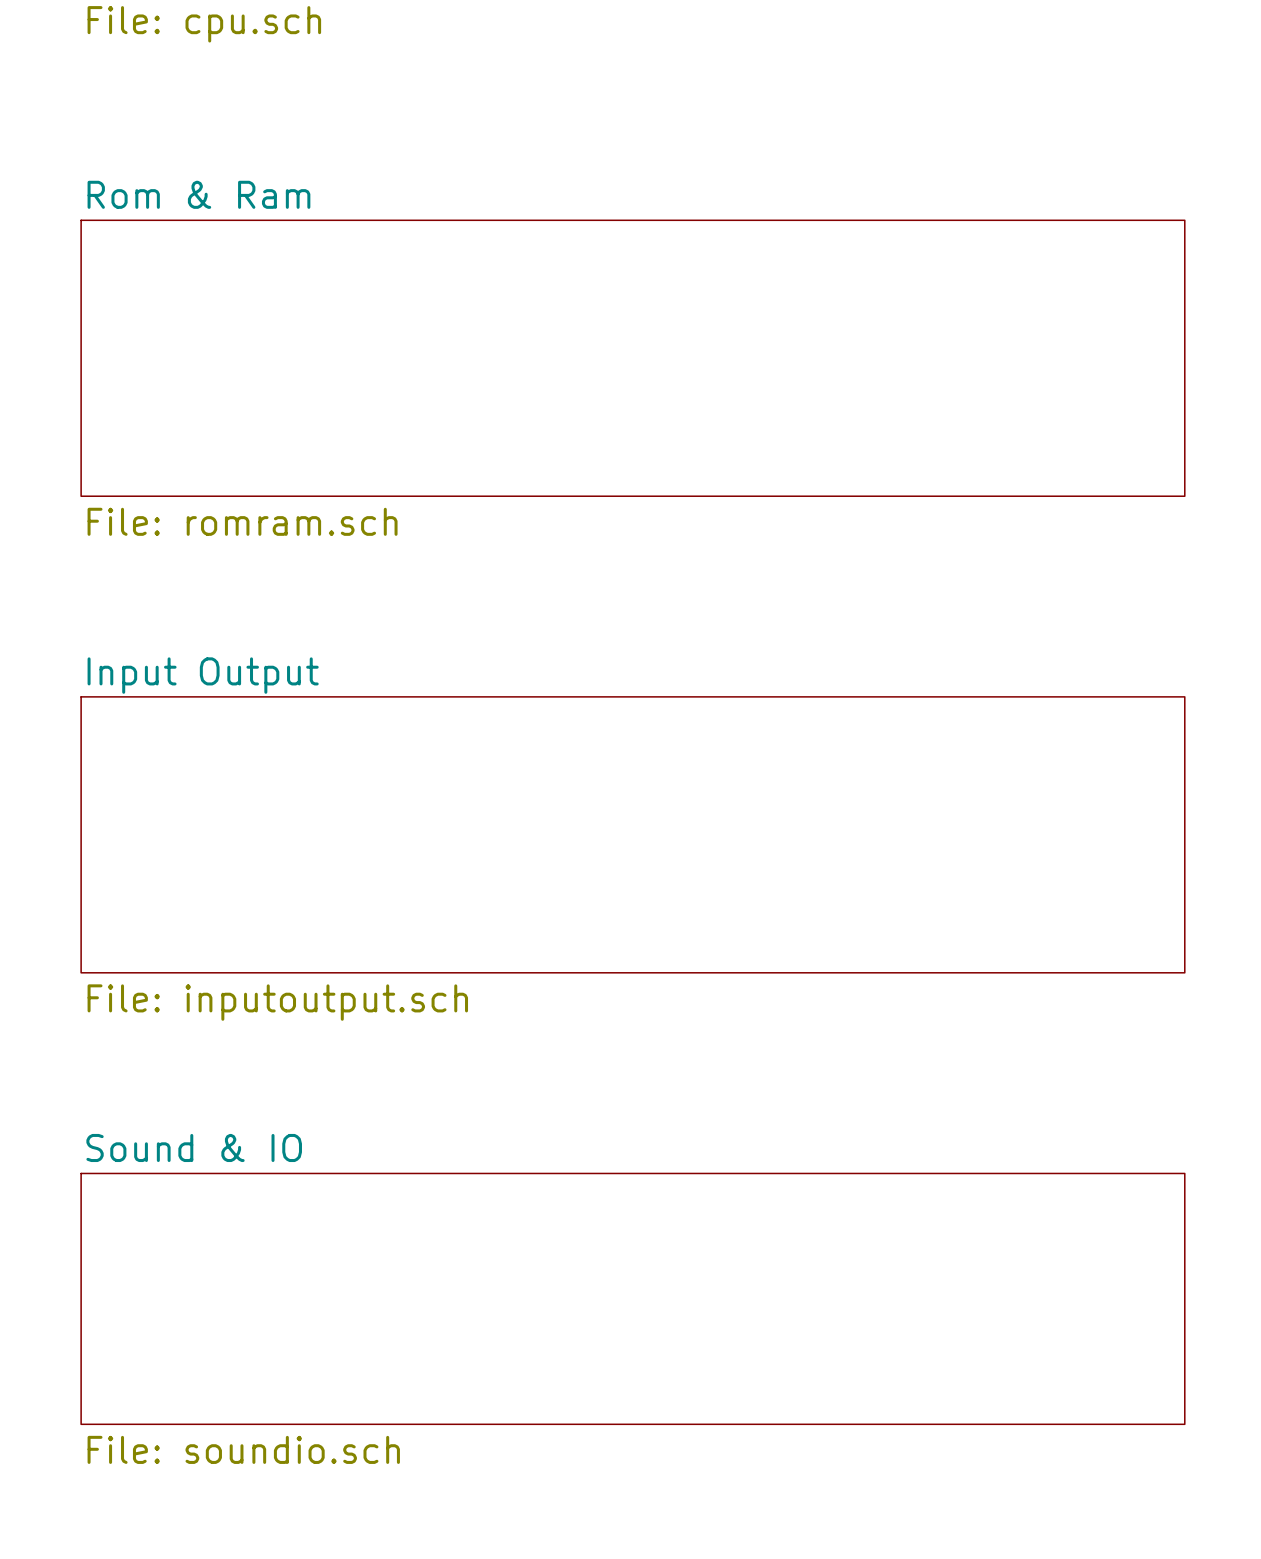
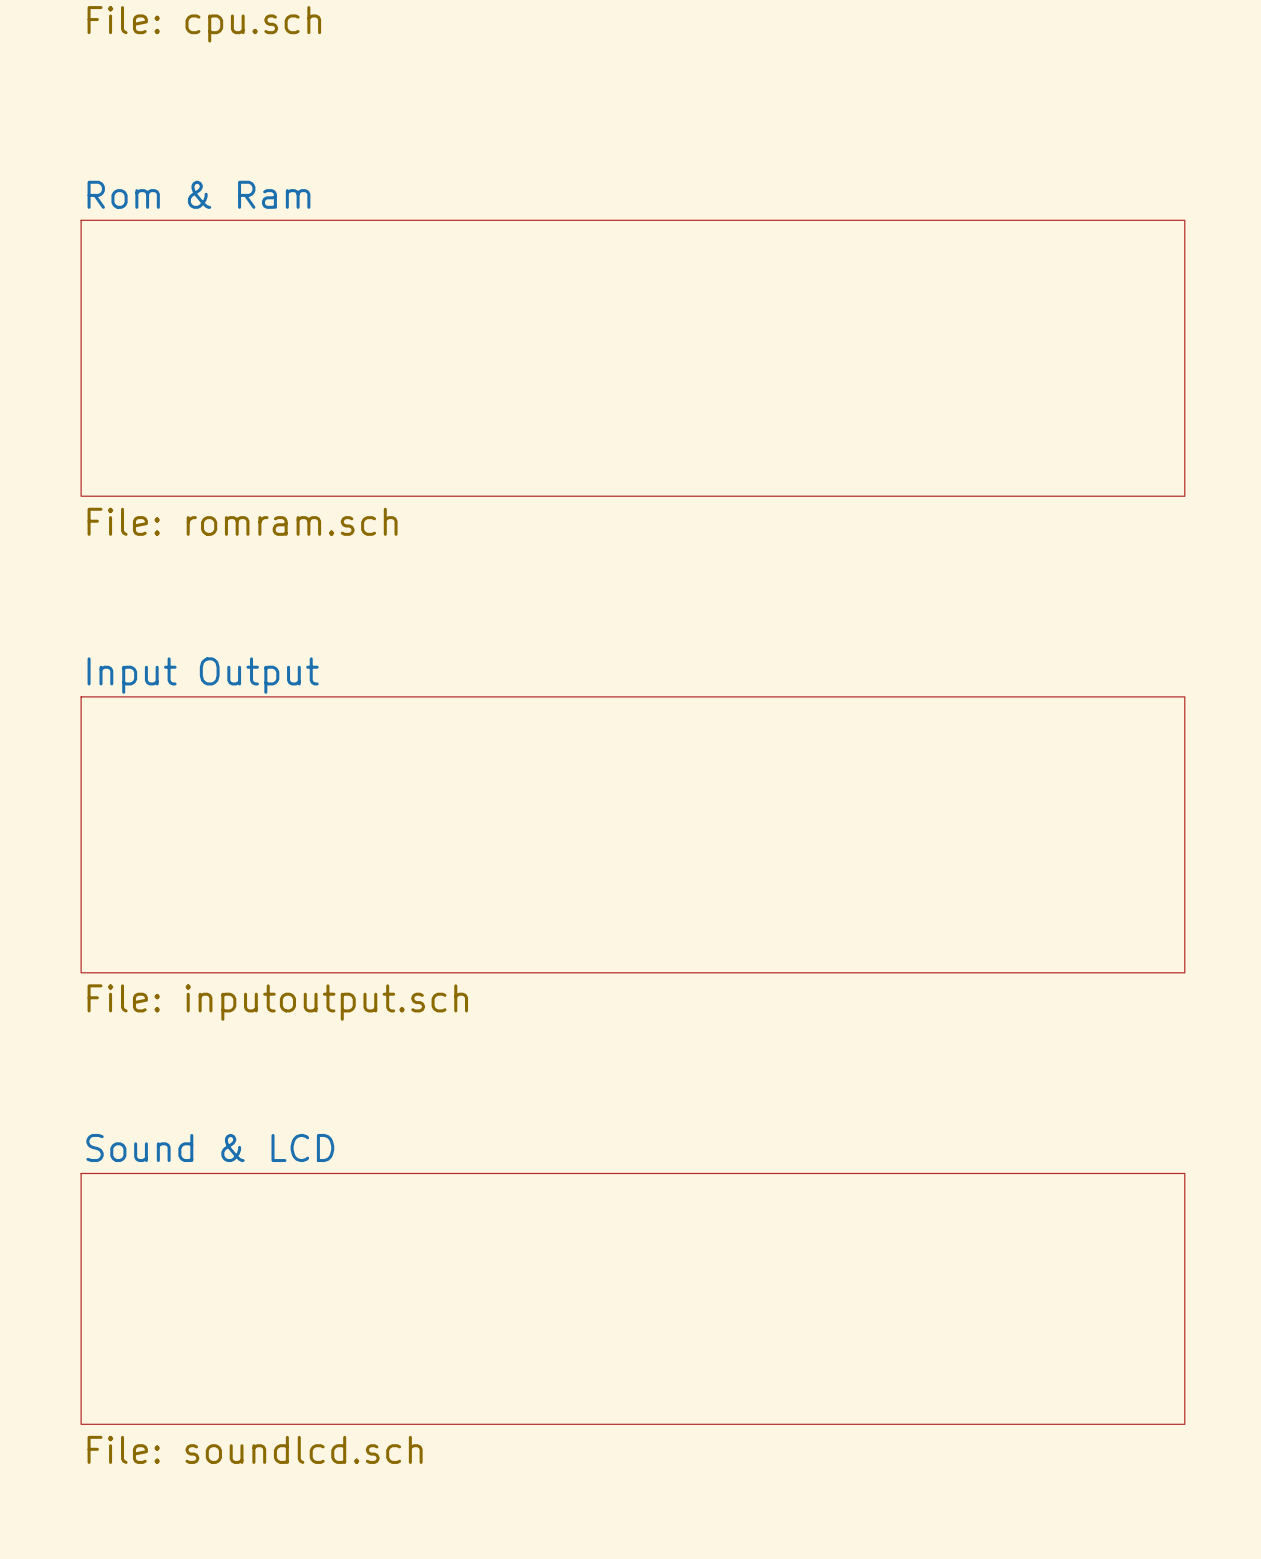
sheet Sound & IO name: Sound & IO (194, 1147) -> Sound & LCD (210, 1147)
sheet Sound & IO value: File: soundio.sch (243, 1449) -> File: soundlcd.sch (255, 1449)

